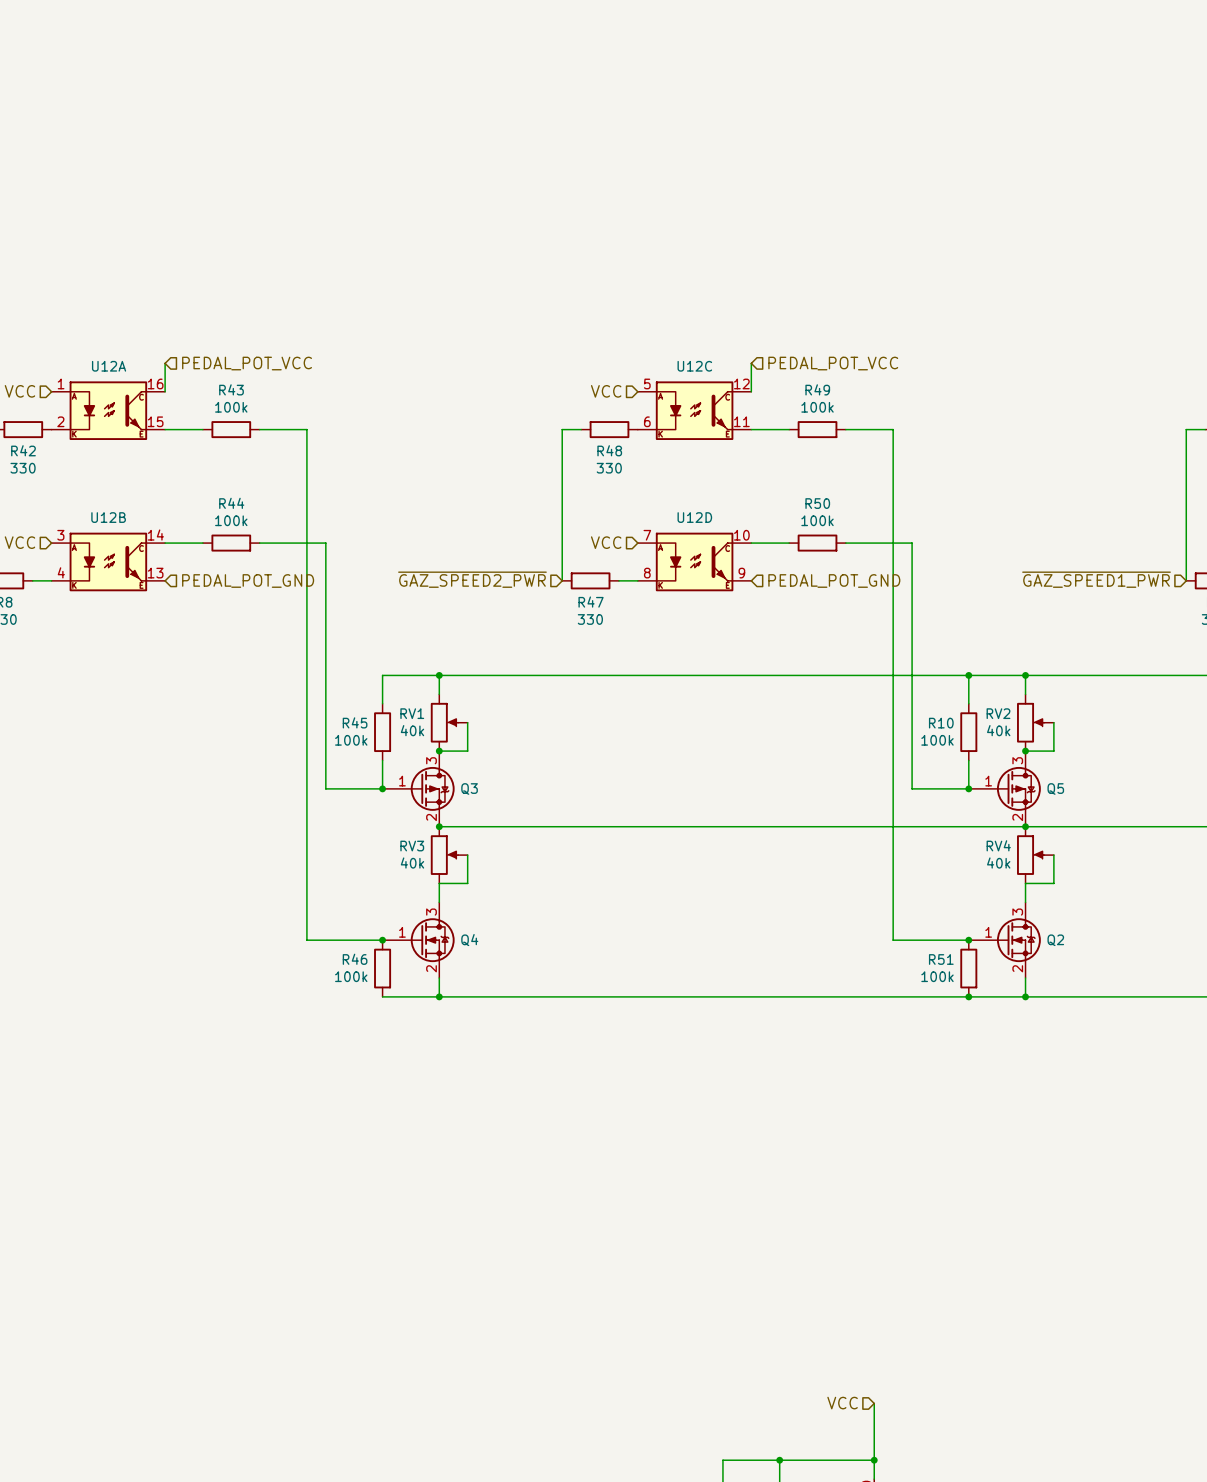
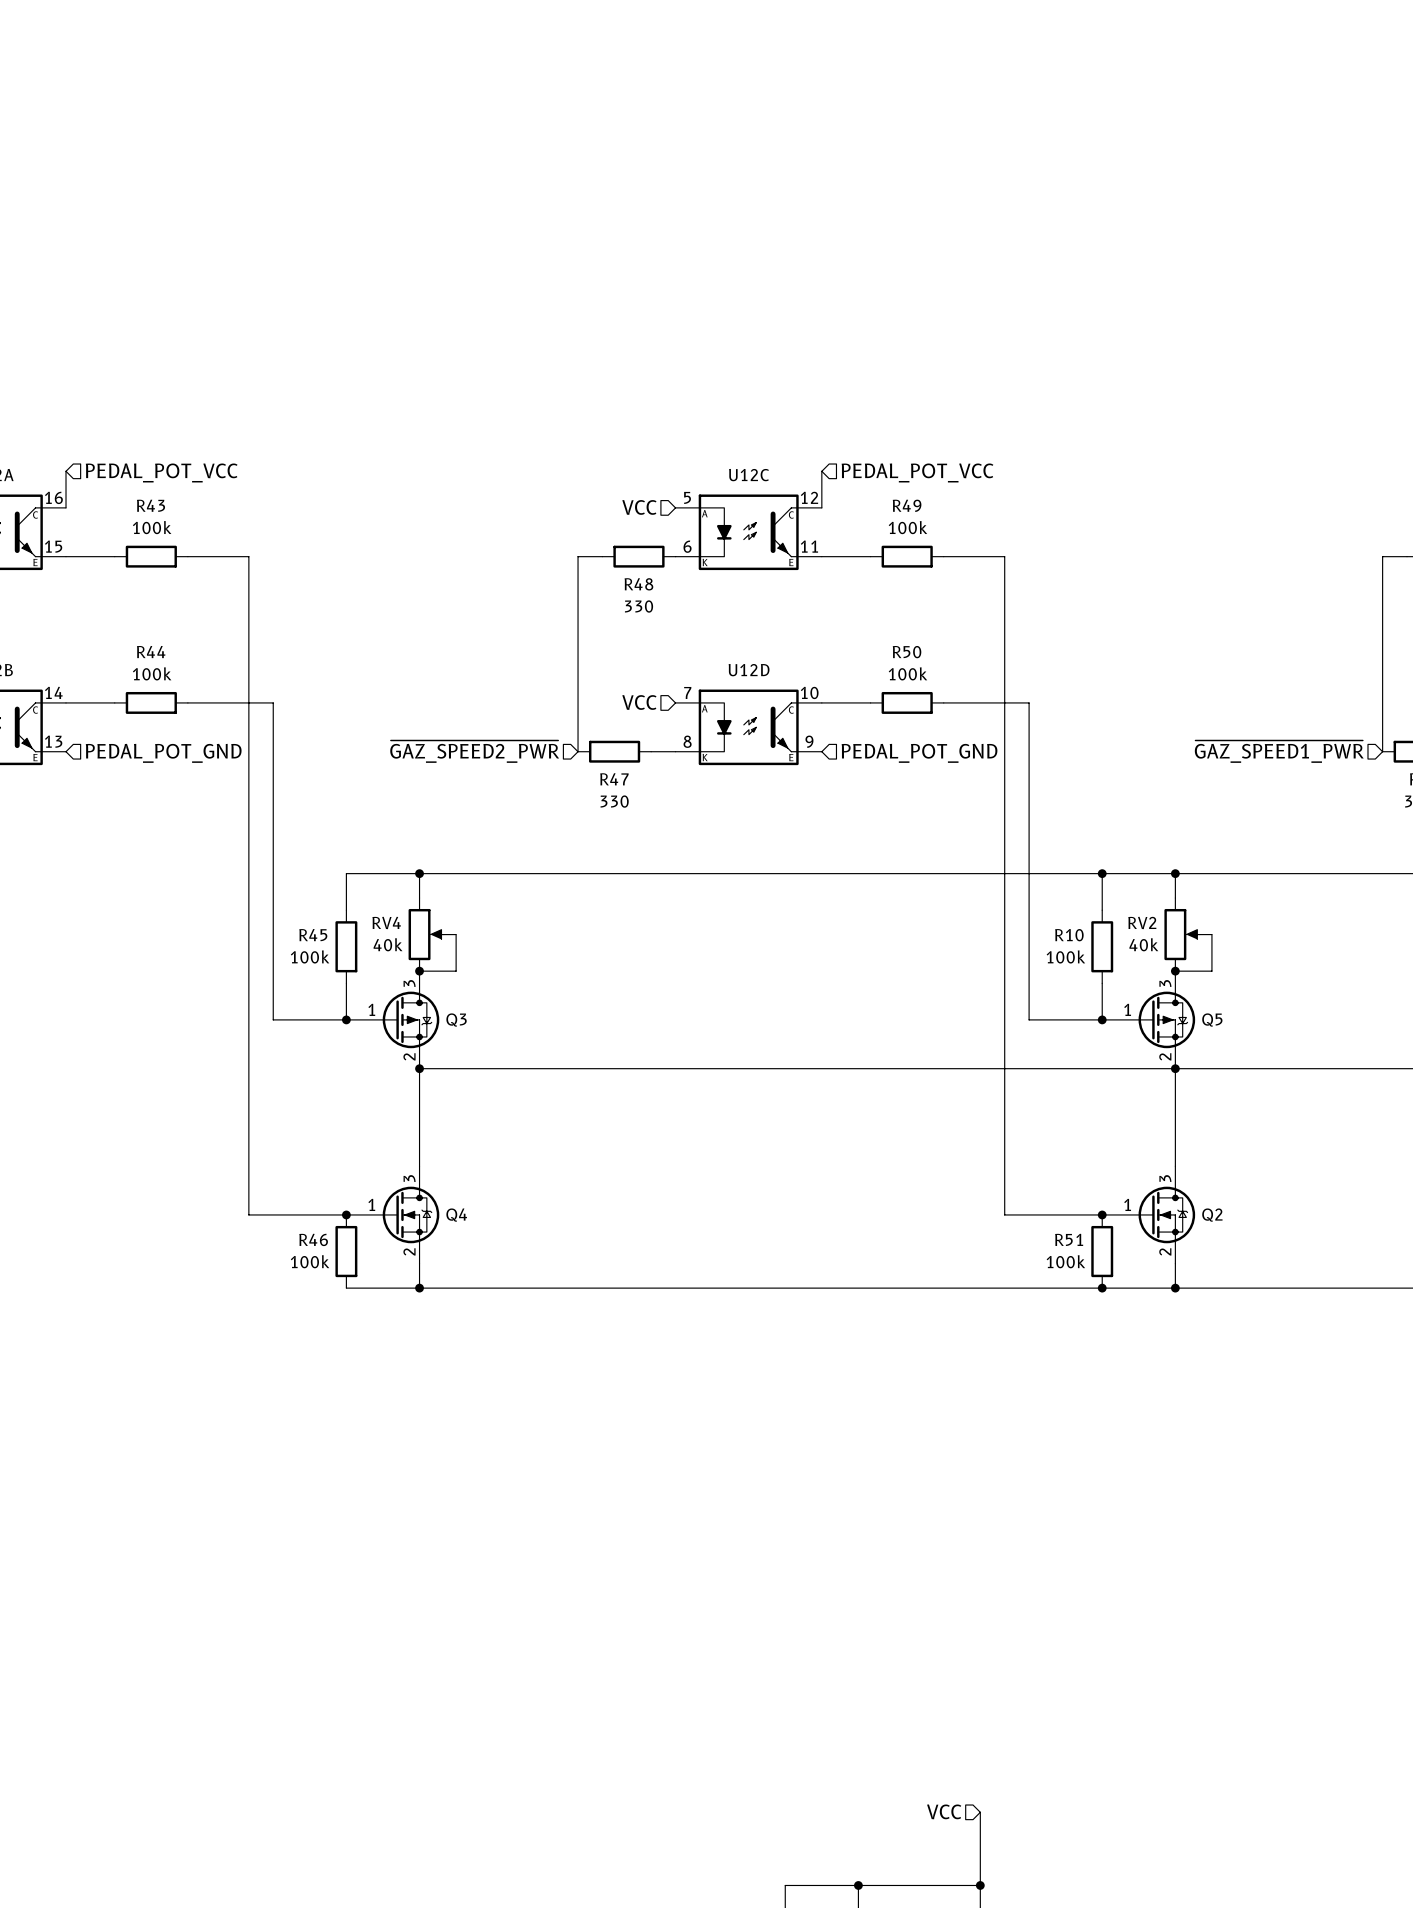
RV1 name: RV1 (412, 713) -> RV4 (386, 922)
RV3: 40k (449, 855) -> none
wire: (467, 855) (467, 883) (439, 883) -> (419, 1068) (419, 1141)
RV4: 40k (1035, 855) -> none
wire: (1053, 855) (1053, 883) (1025, 883) -> (1175, 1068) (1175, 1141)

